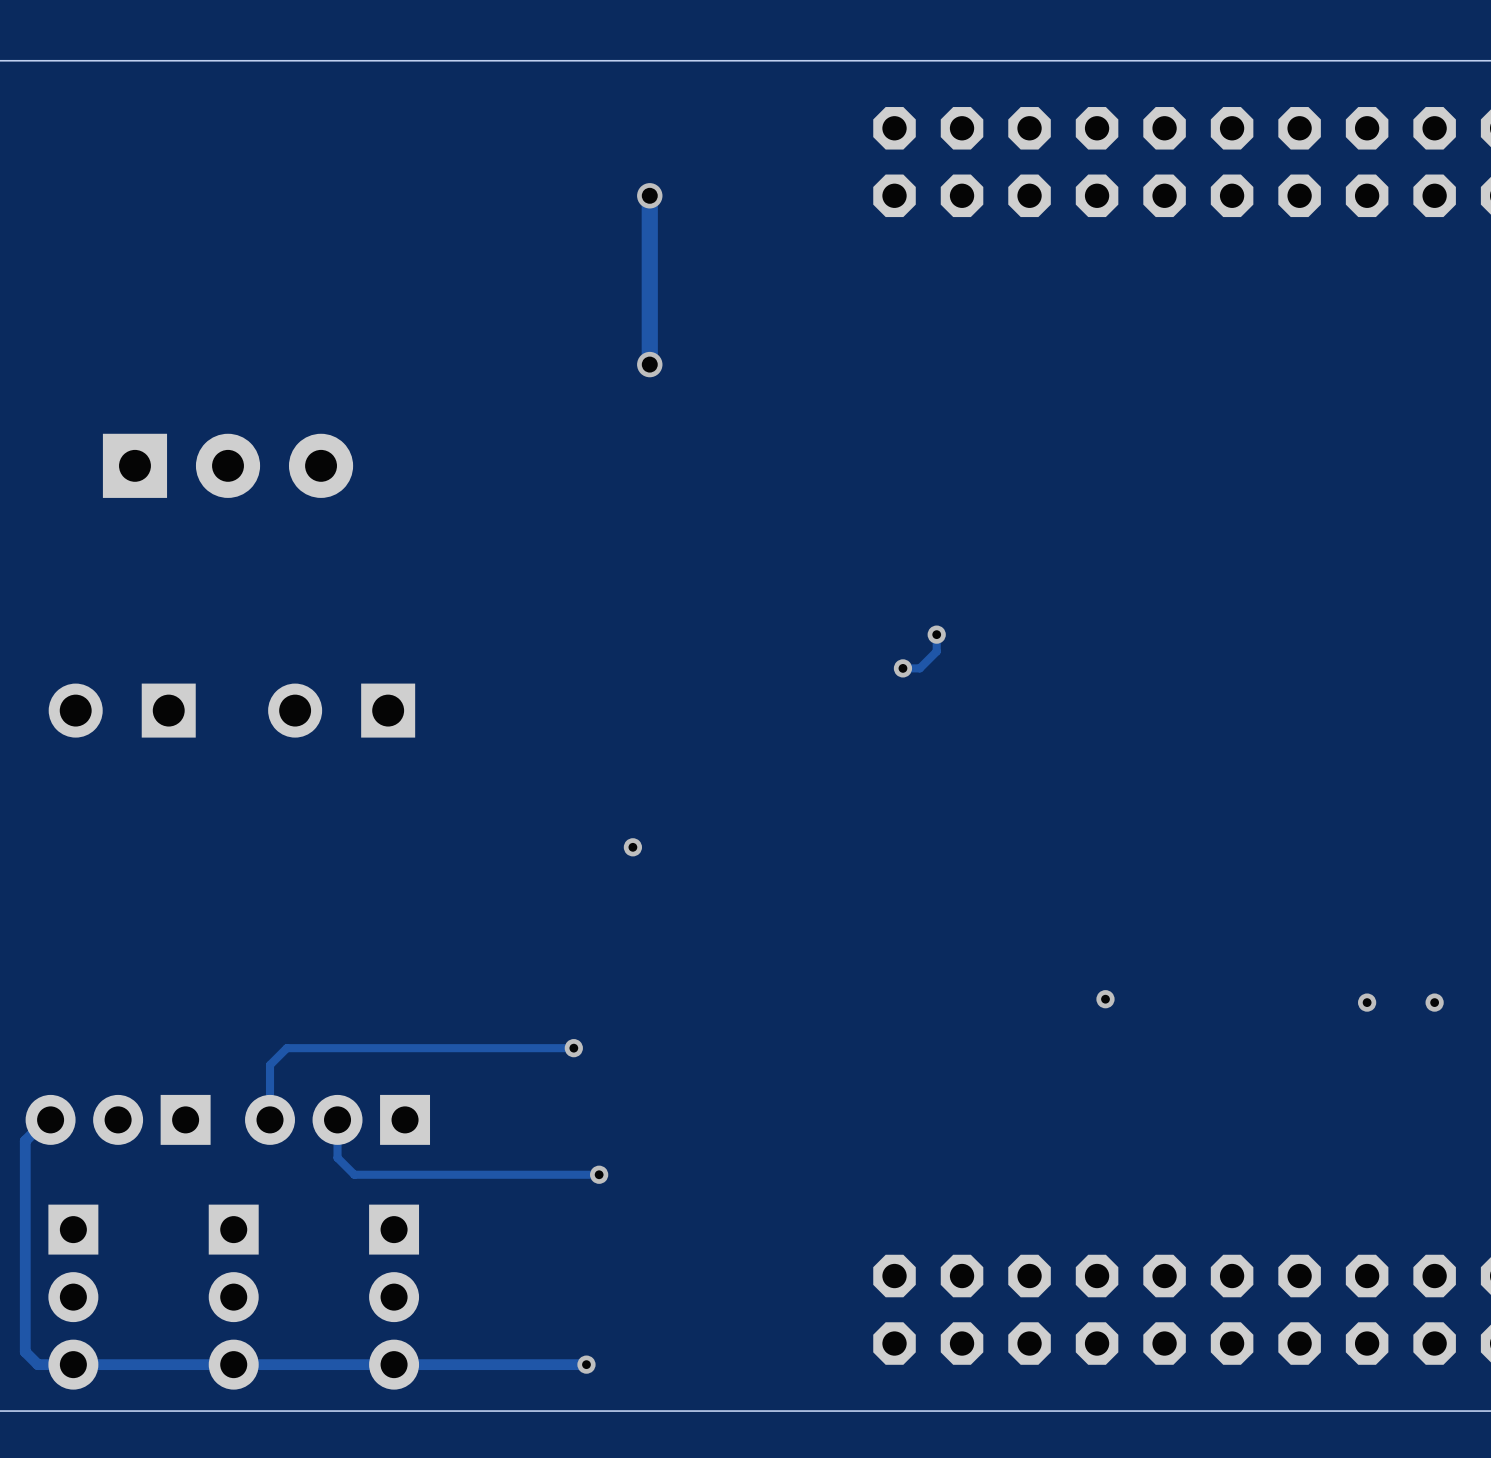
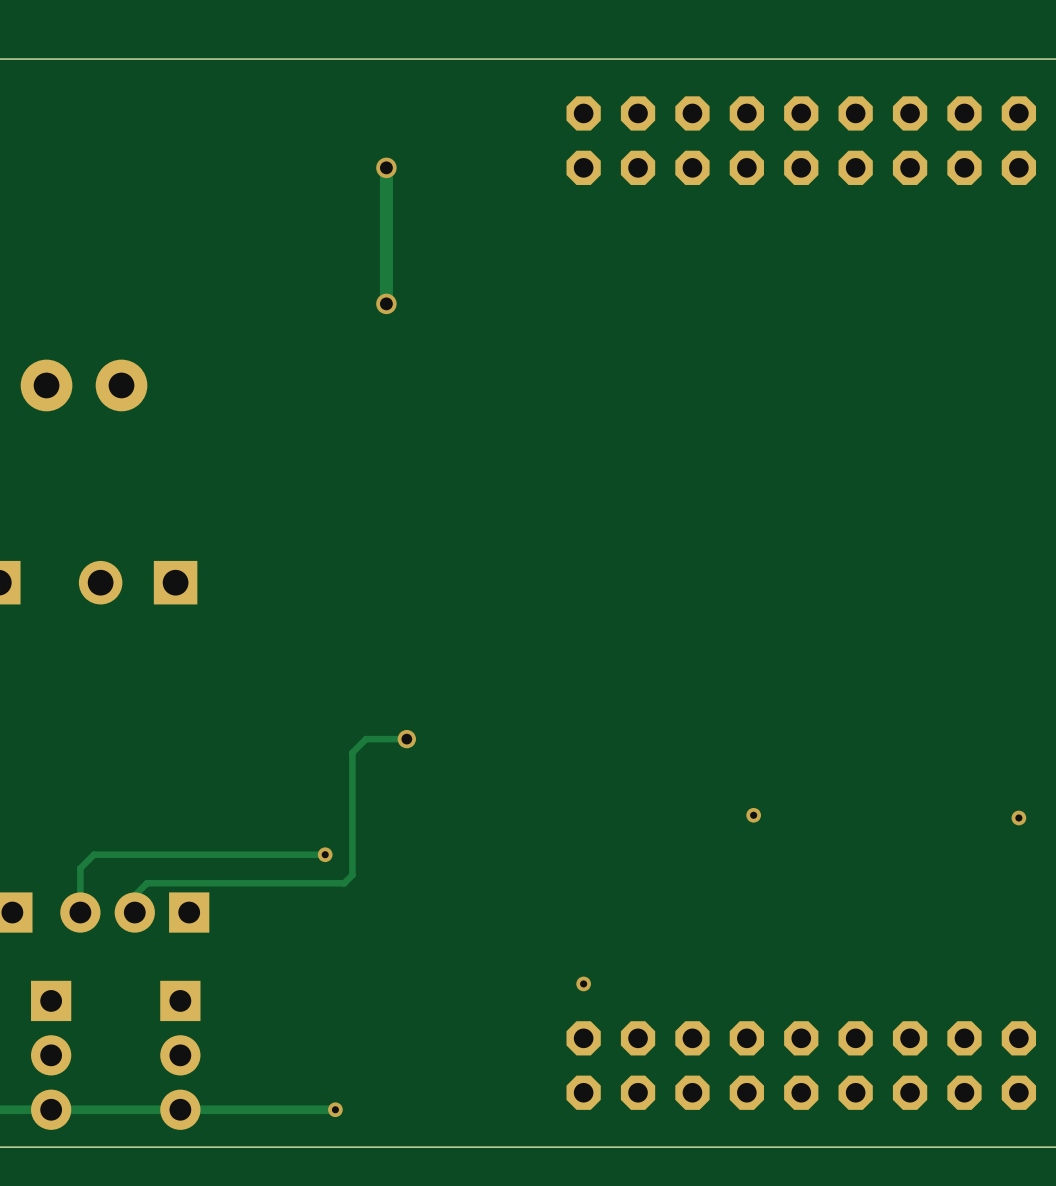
track: (936, 634) (936, 651) (919, 668) (902, 668) -> none
via: (936, 634) -> none
via: (902, 668) -> none
via: (632, 847) -> none
via: none -> (406, 739)
via: (1367, 1002) -> none
track: (337, 1119) (337, 1157) (354, 1174) (599, 1174) -> (134, 912) (134, 895) (147, 883) (344, 883) (352, 875) (352, 752) (366, 739) (406, 739)
via: (599, 1174) -> none
via: none -> (583, 983)

